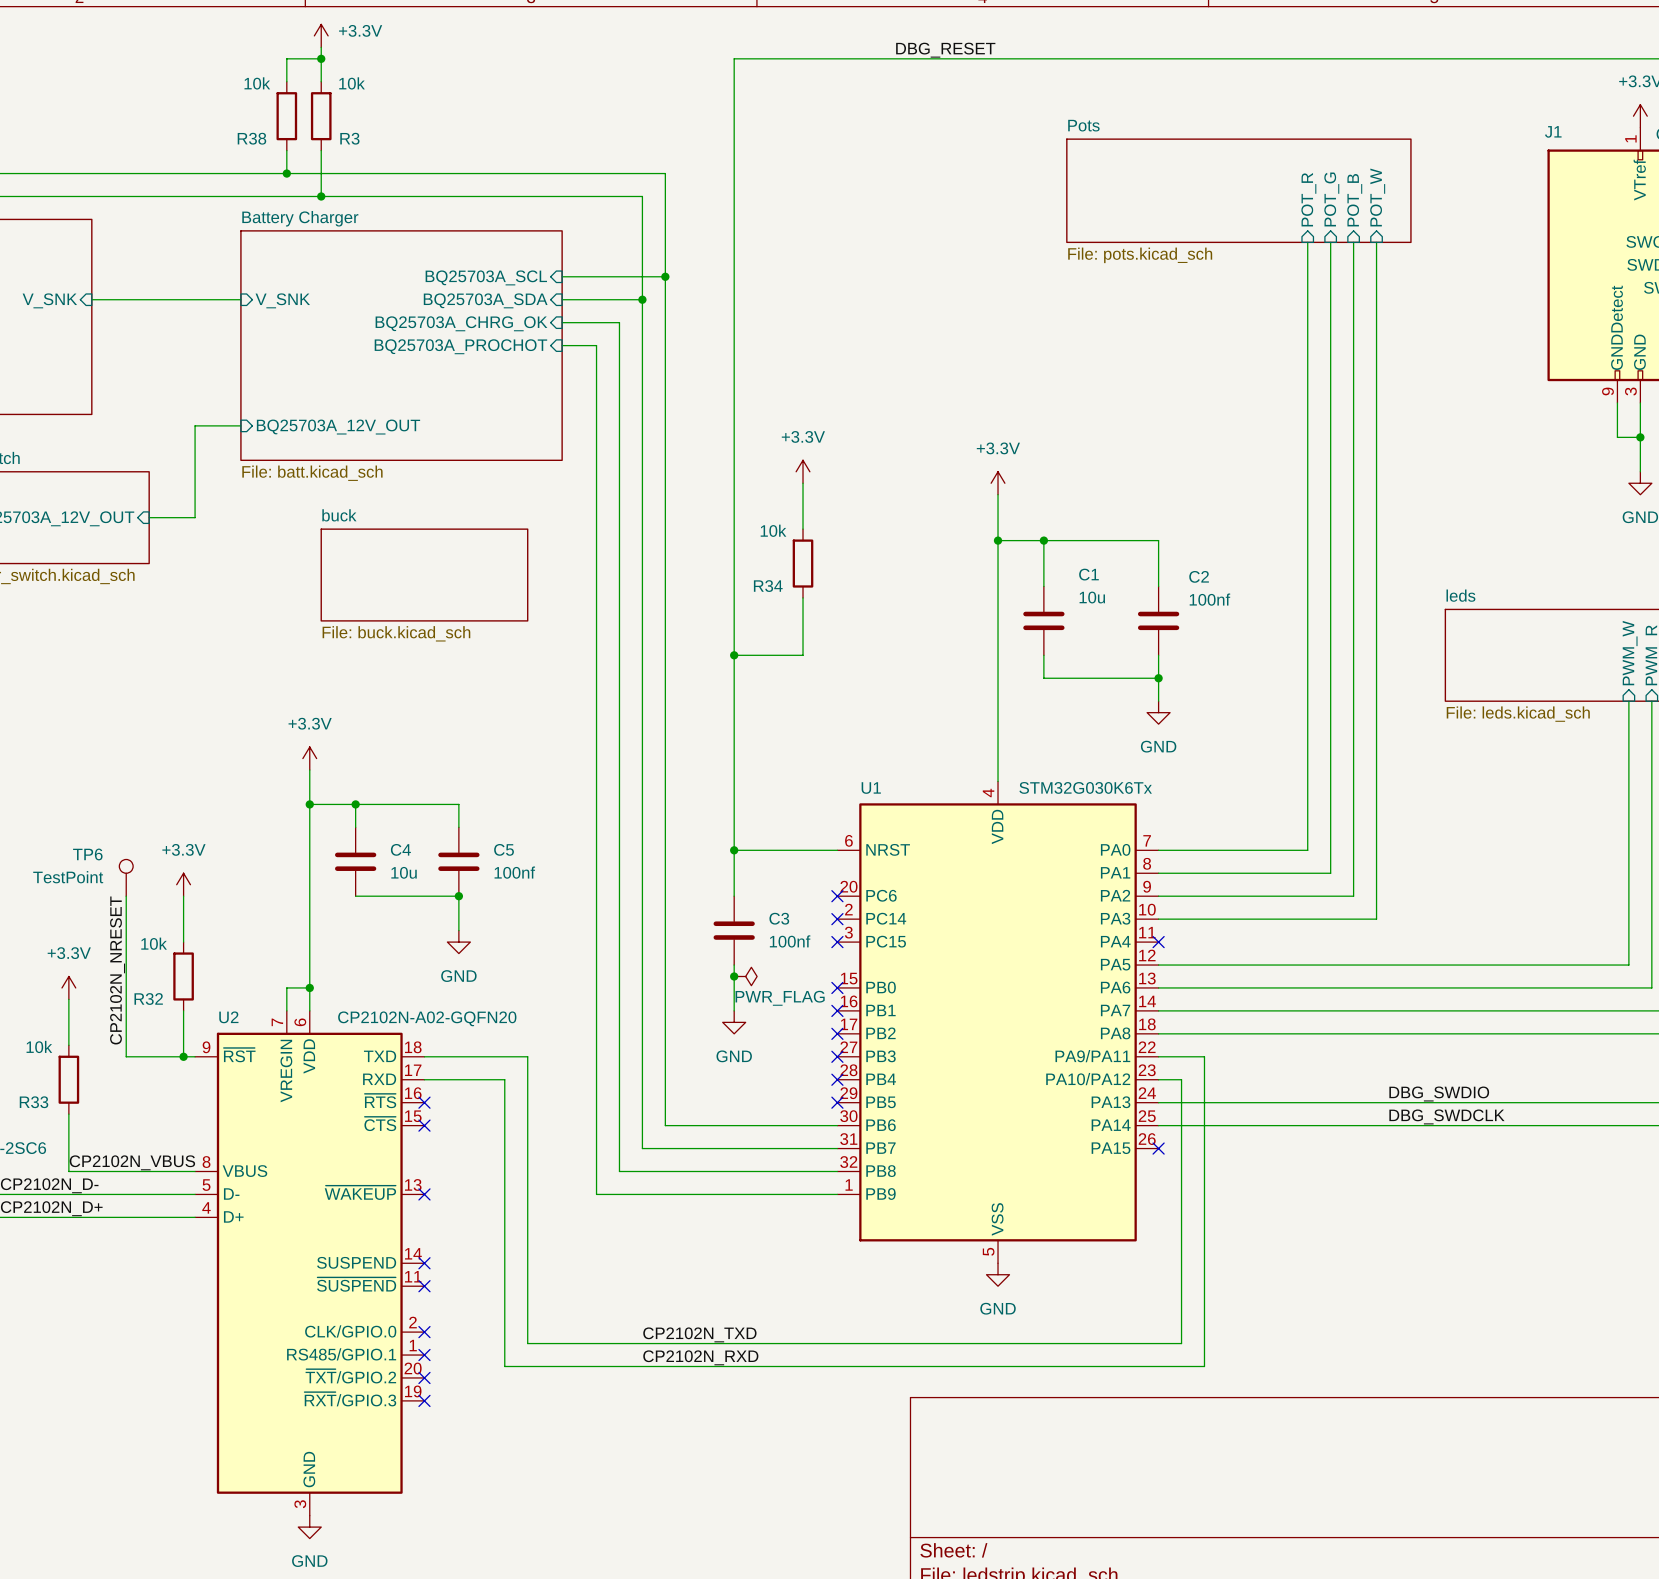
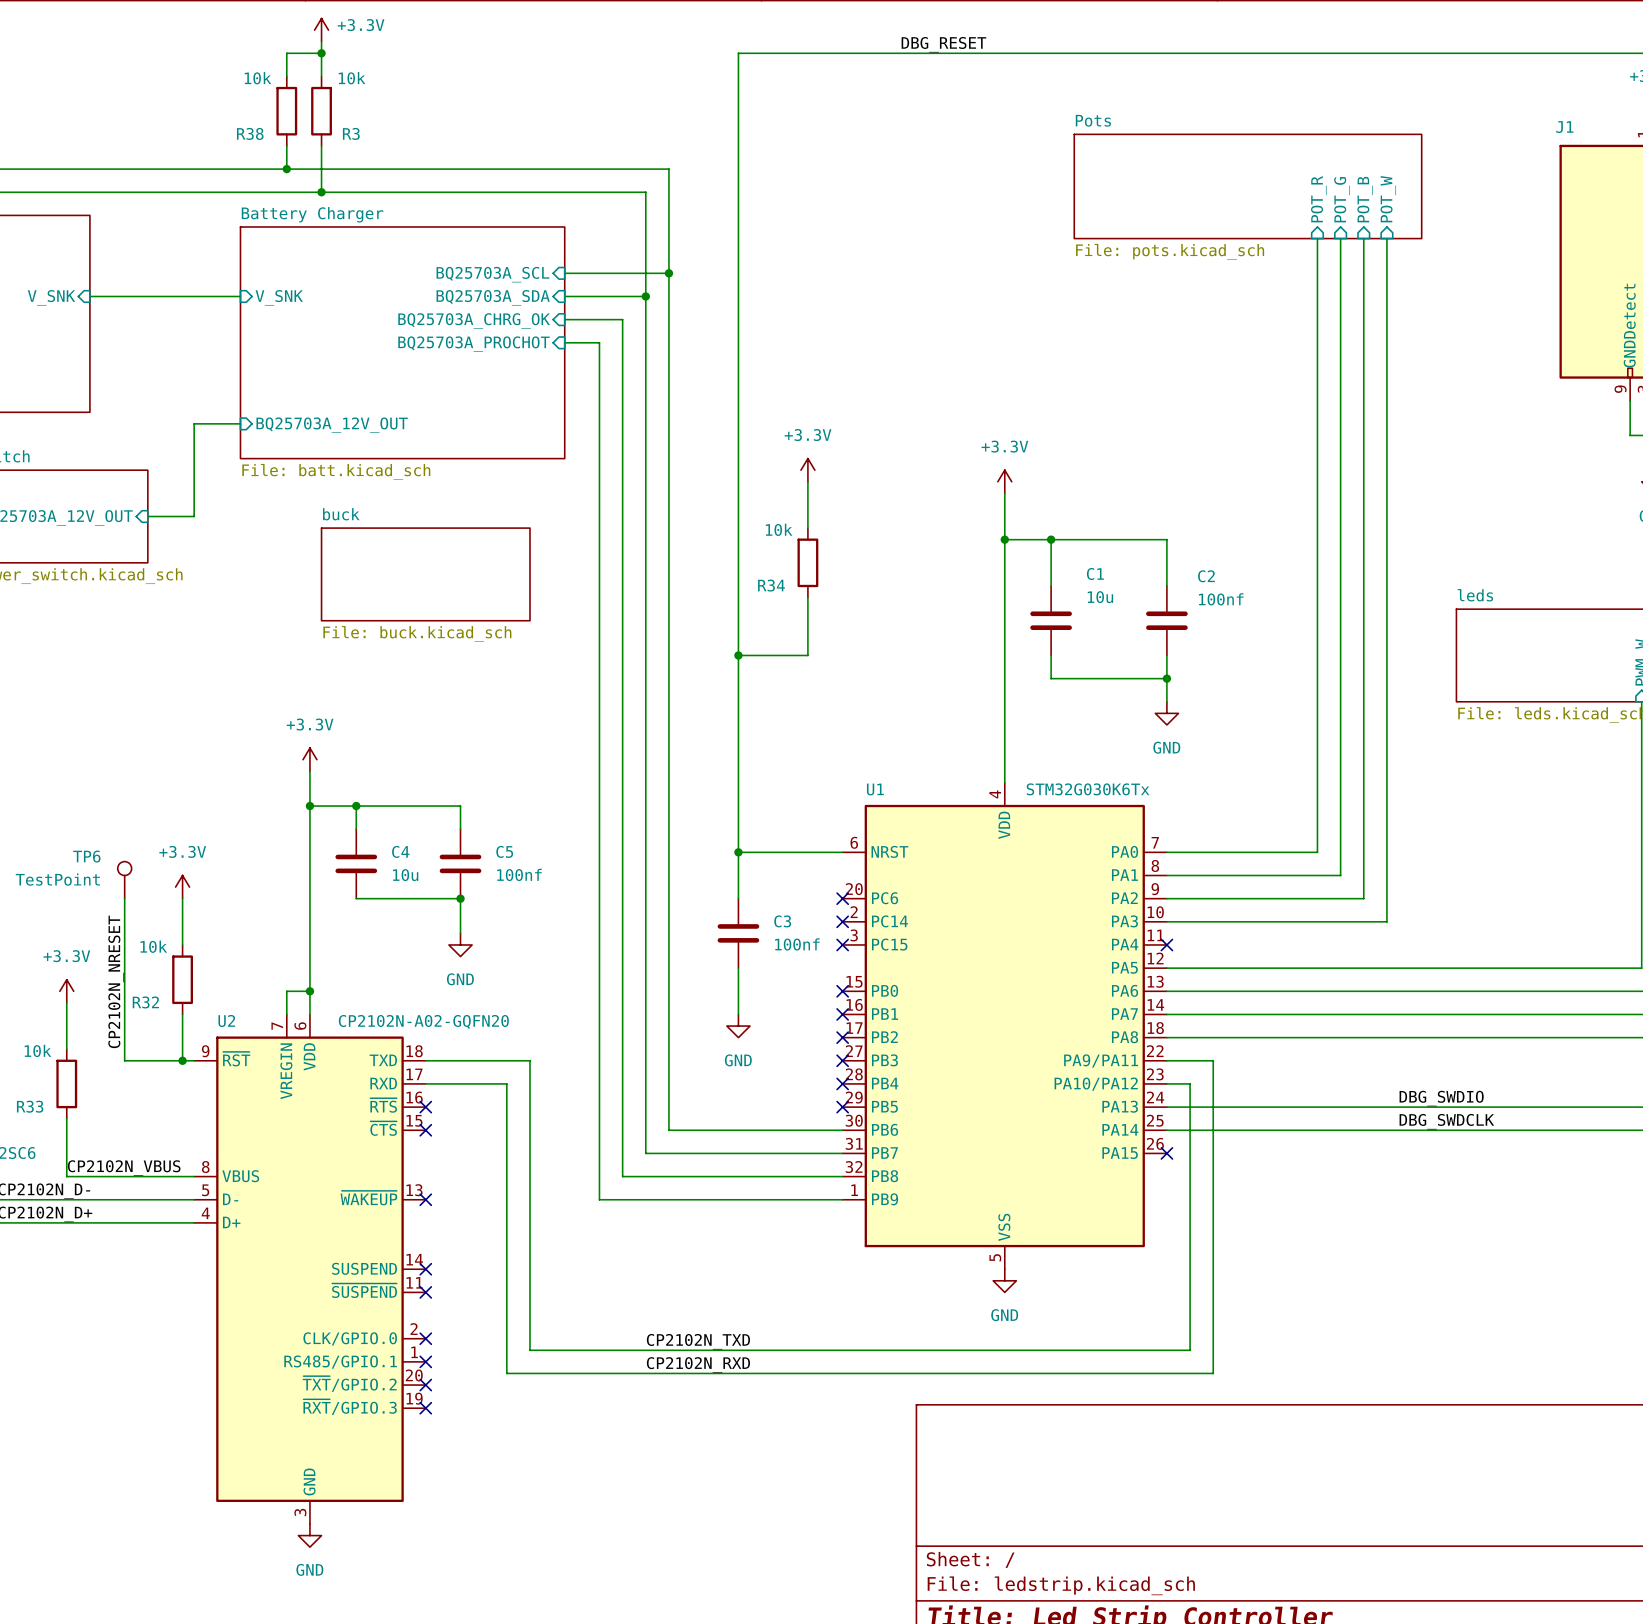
junction: (734, 976) -> none
power symbol: PWR_FLAG (745, 976) -> none

